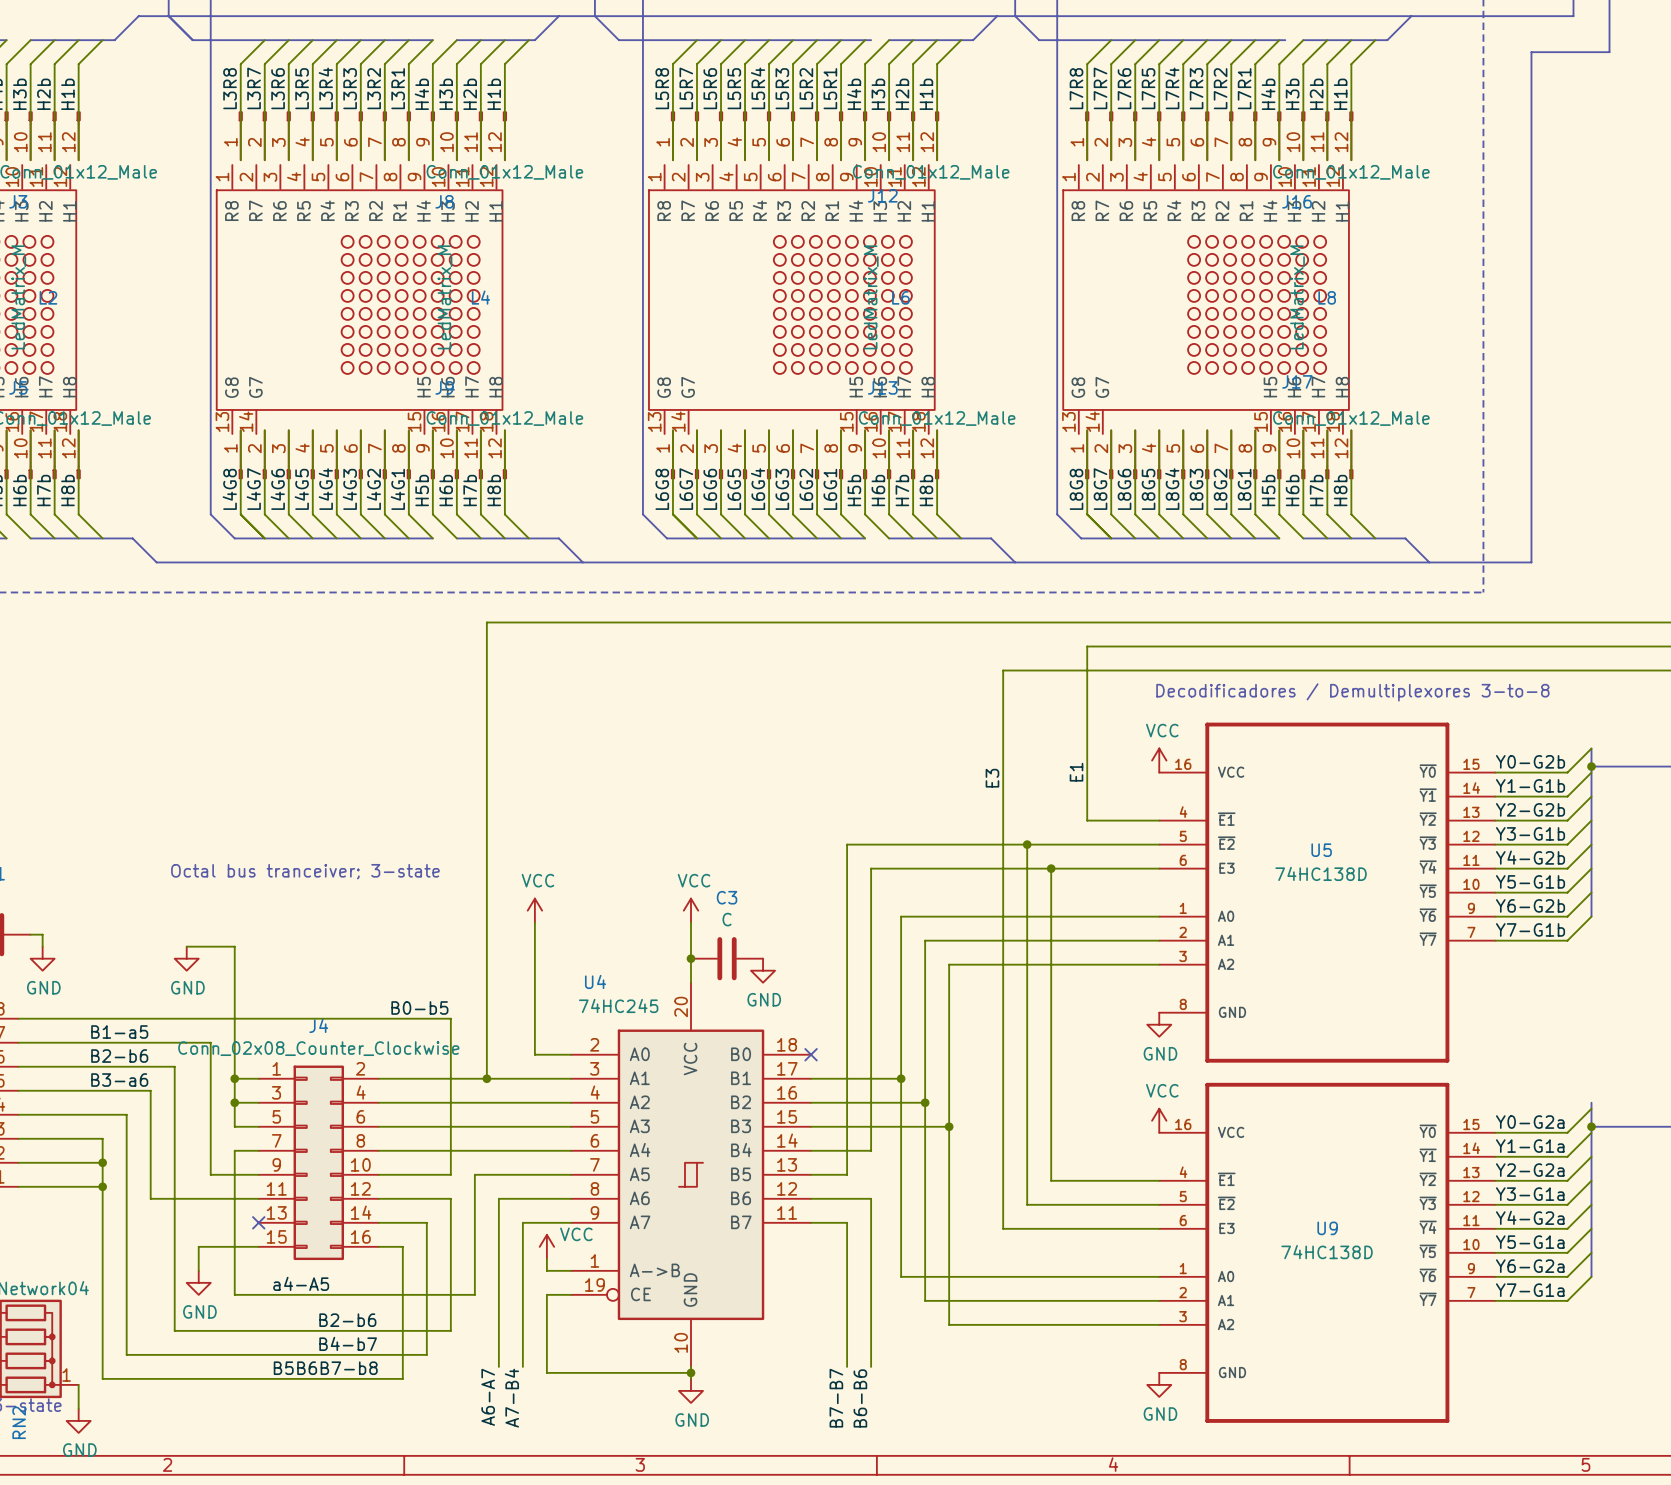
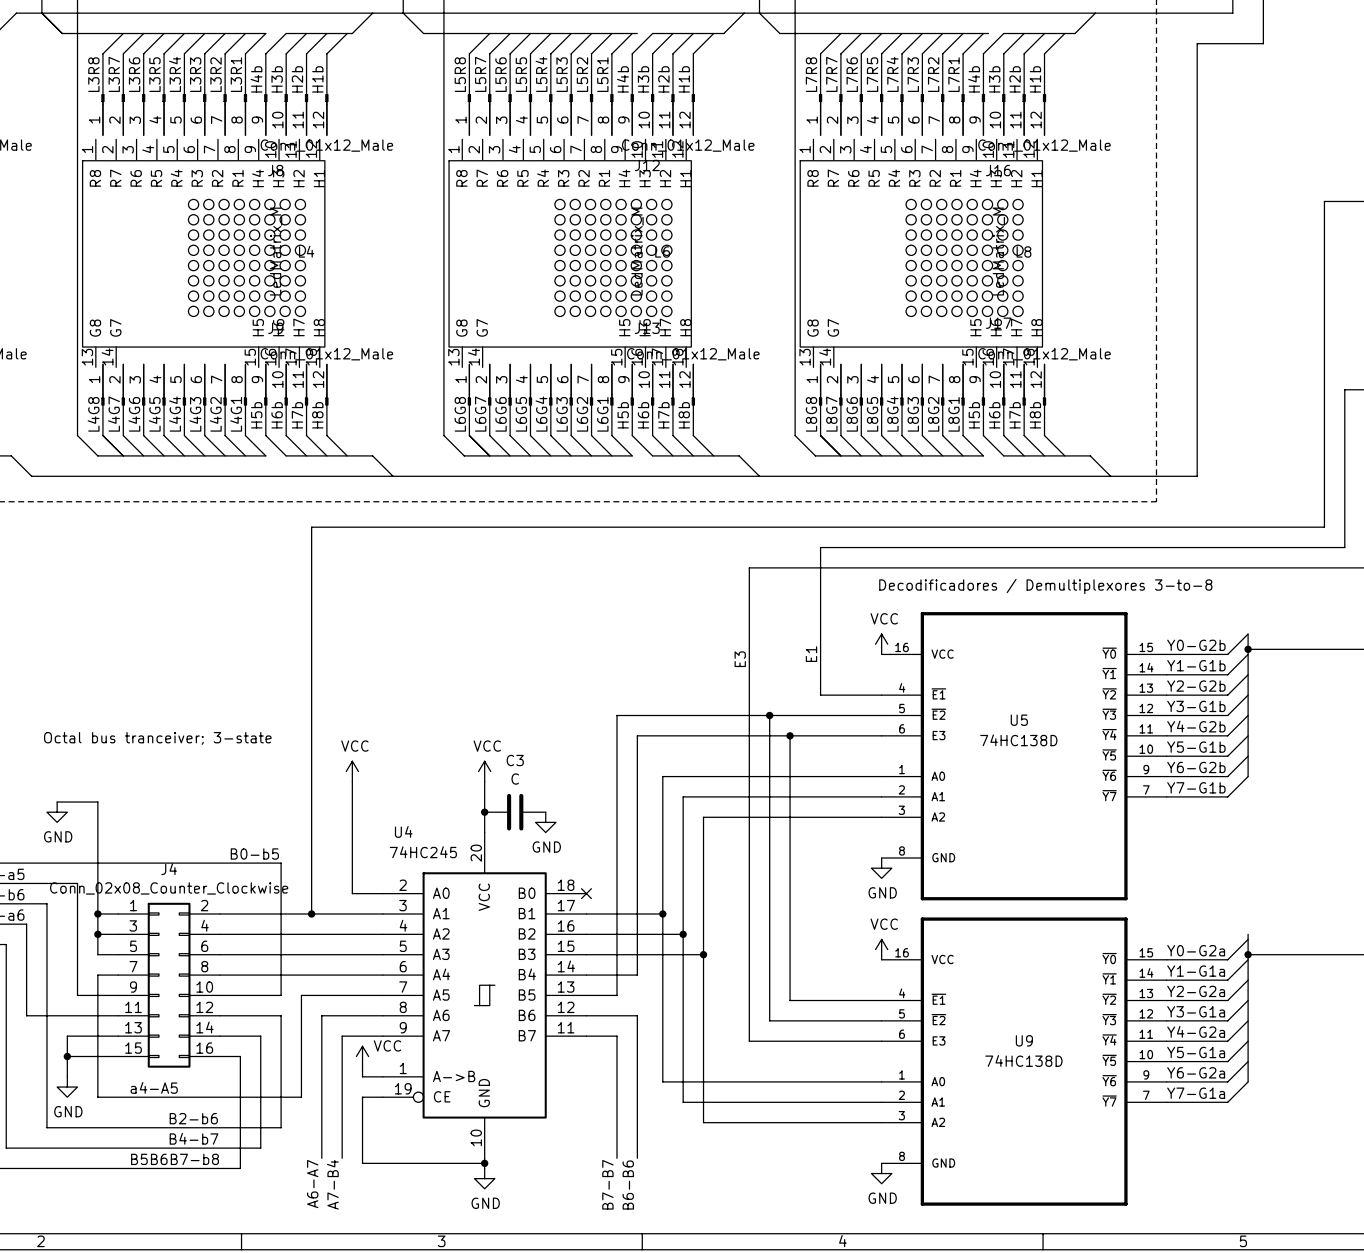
wire: none -> (118, 1036) (67, 1036) (67, 1056)
no-connect mark: (258, 1222) -> none
junction: none -> (67, 1056)

